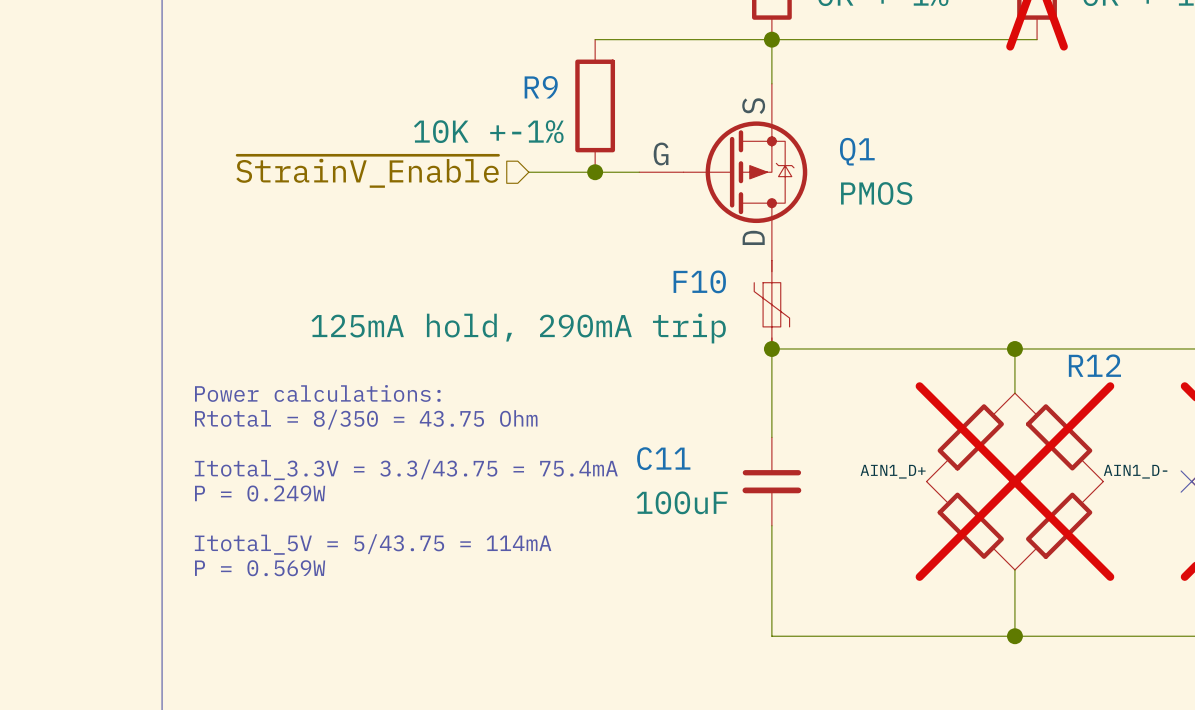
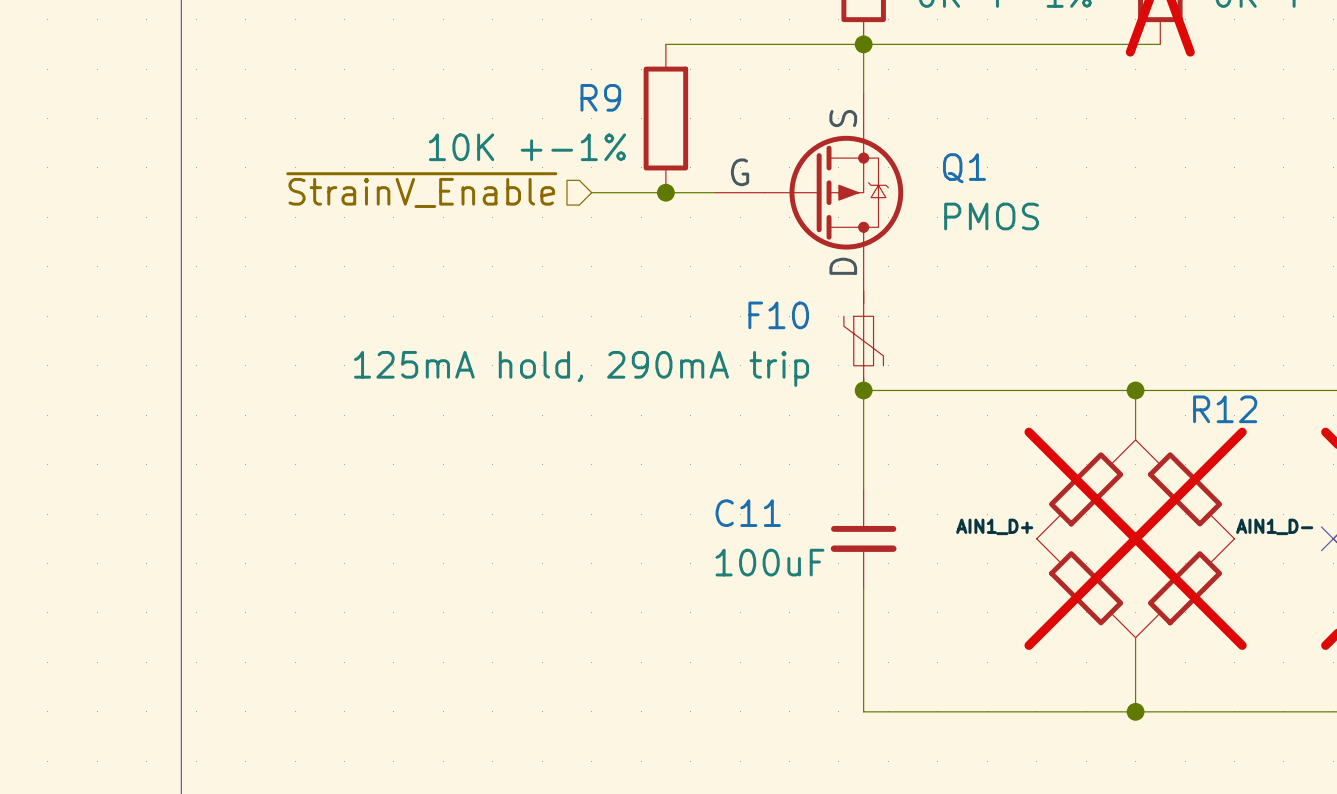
text: Power calculations: (317, 393) -> none
text: Rtotal = 8/350 = 43.75 Ohm (366, 419) -> none
text: Itotal_3.3V = 3.3/43.75 = 75.4mA (406, 469) -> none
text: P = 0.249W (260, 493) -> none
text: Itotal_5V = 5/43.75 = 114mA (373, 544) -> none
text: P = 0.569W (260, 568) -> none

